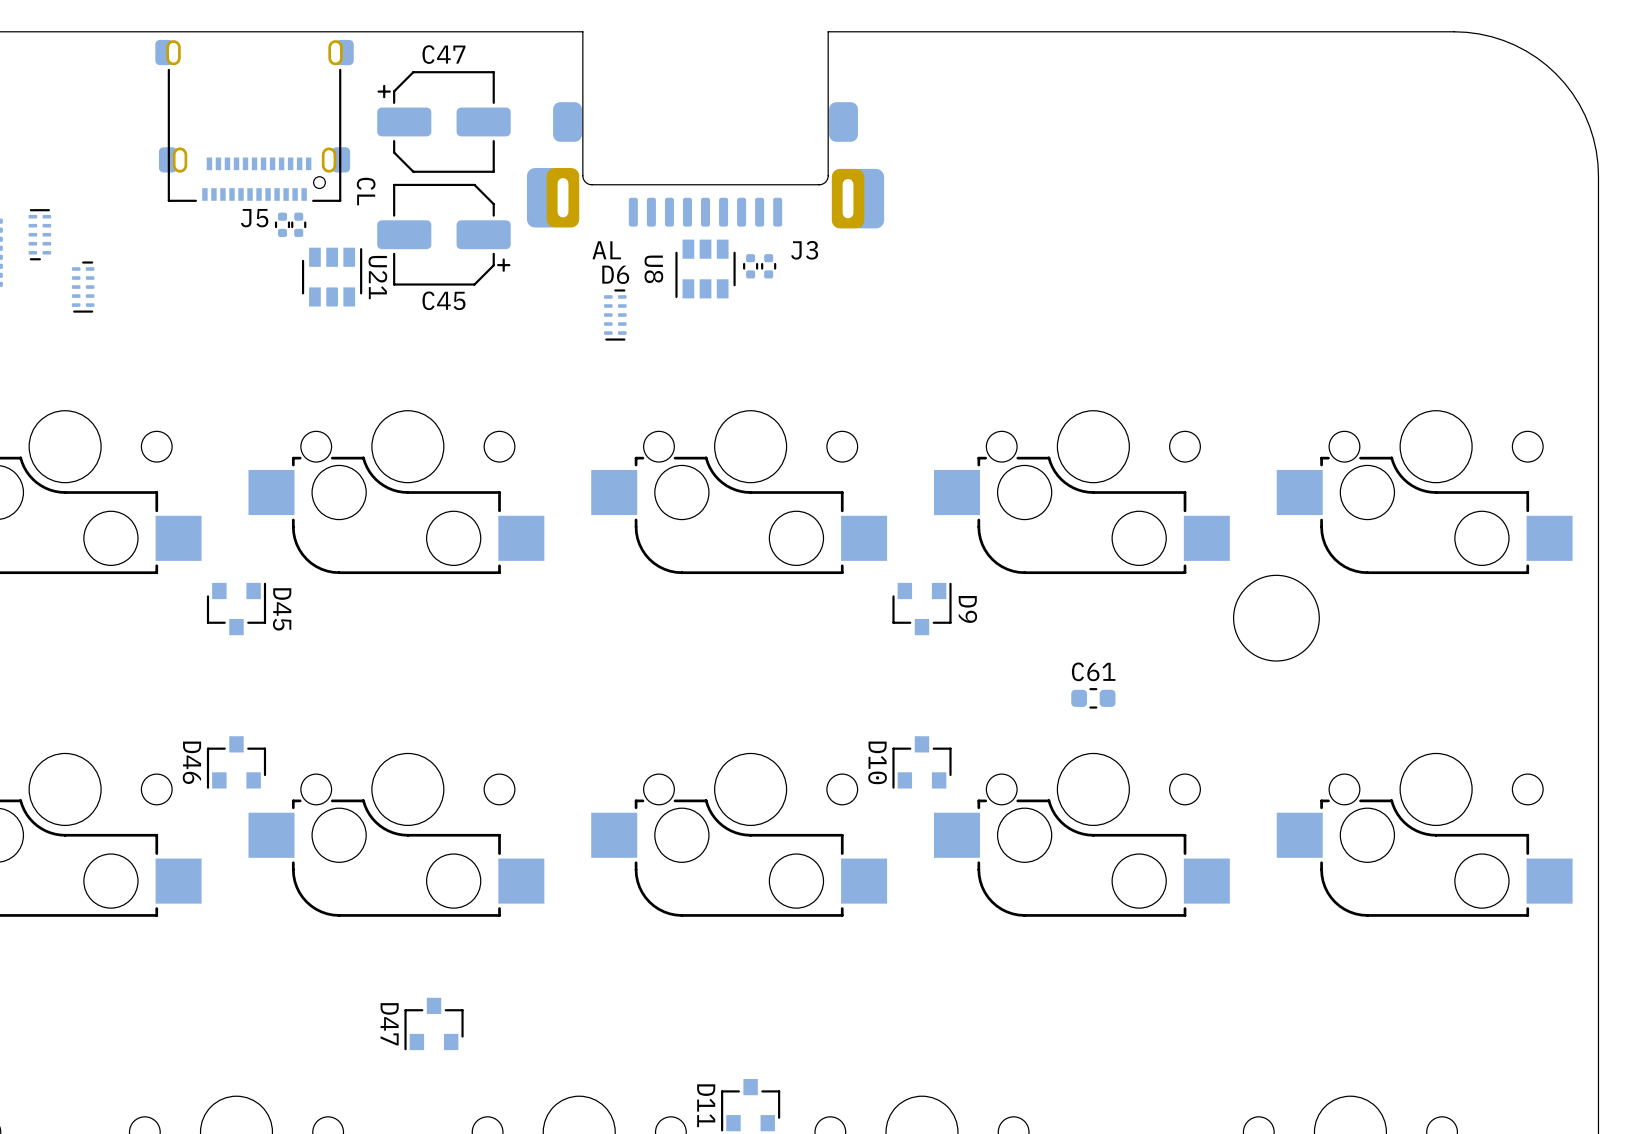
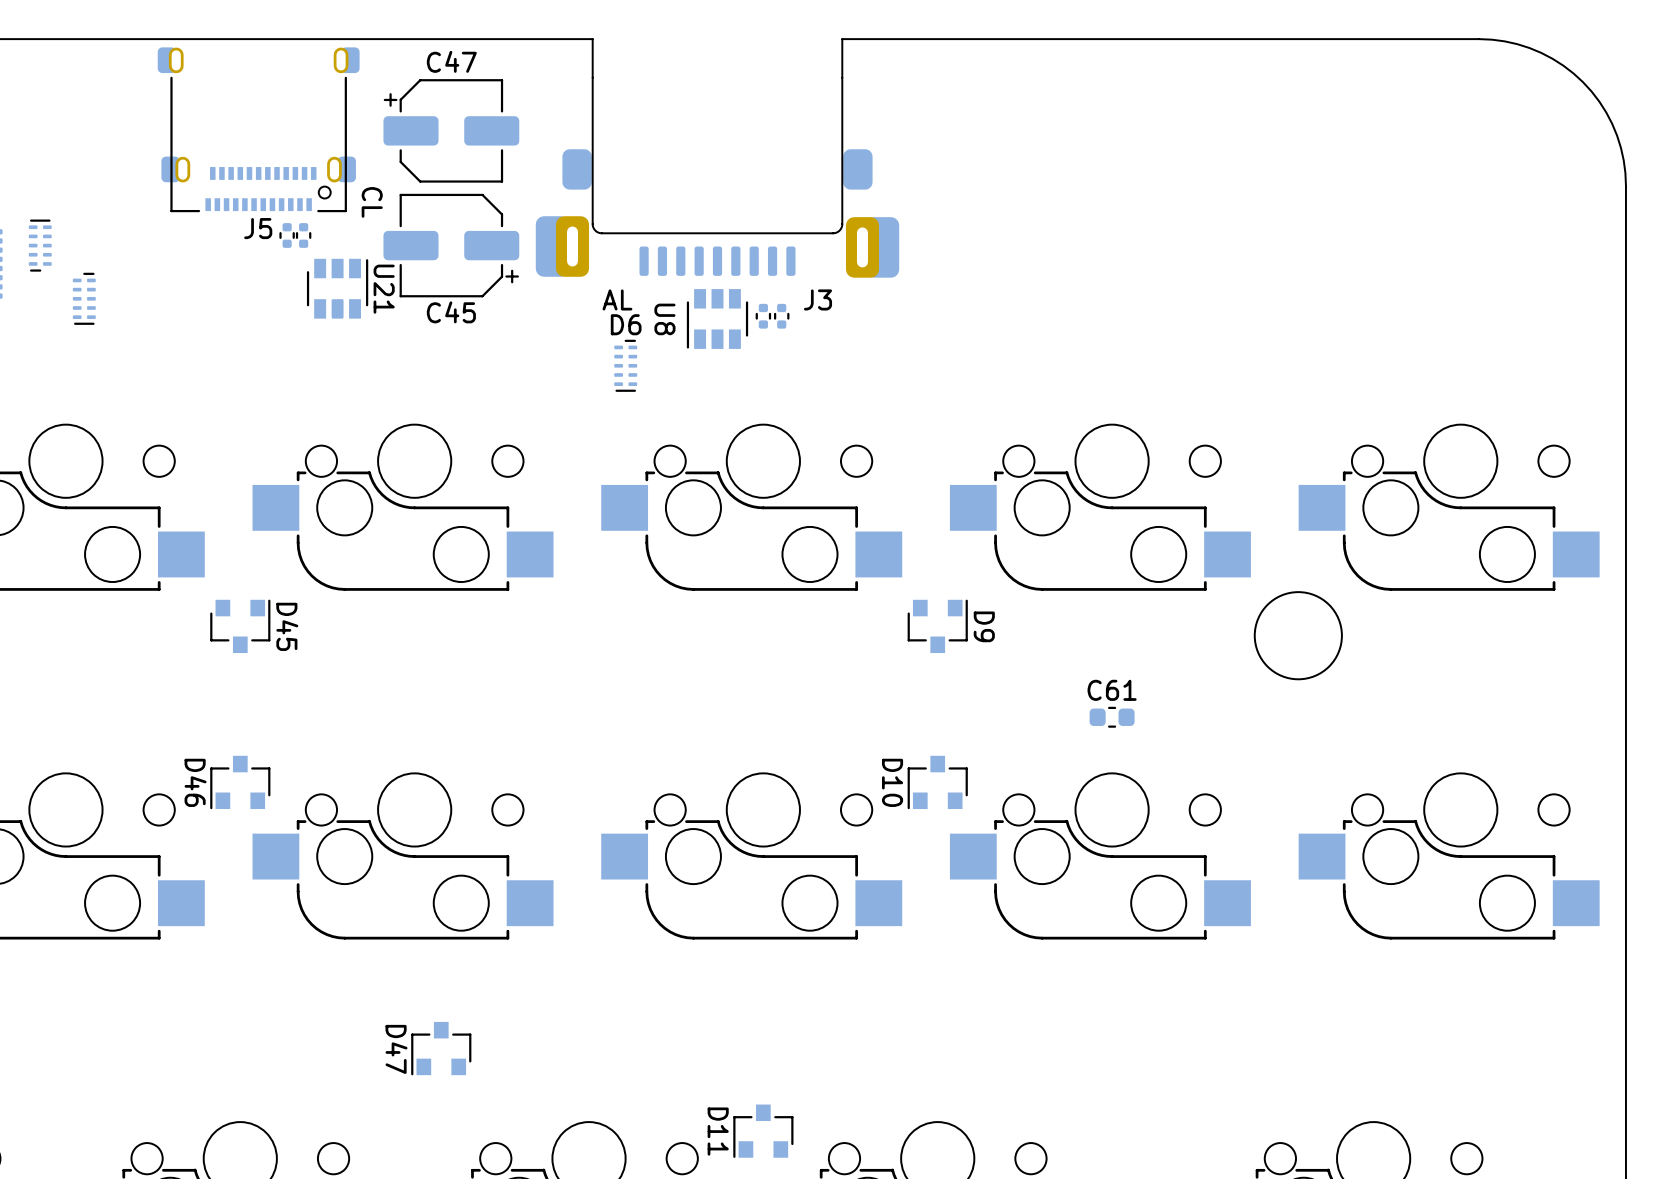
J3 position: (705, 129) -> (717, 177)
text position: AL (606, 250) -> AL (617, 299)
part: (750, 266) -> none
part: (768, 266) -> none
U8 position: (705, 269) -> (717, 319)
part: none -> (763, 316)
part: none -> (781, 316)
D6 position: (615, 315) -> (625, 365)

